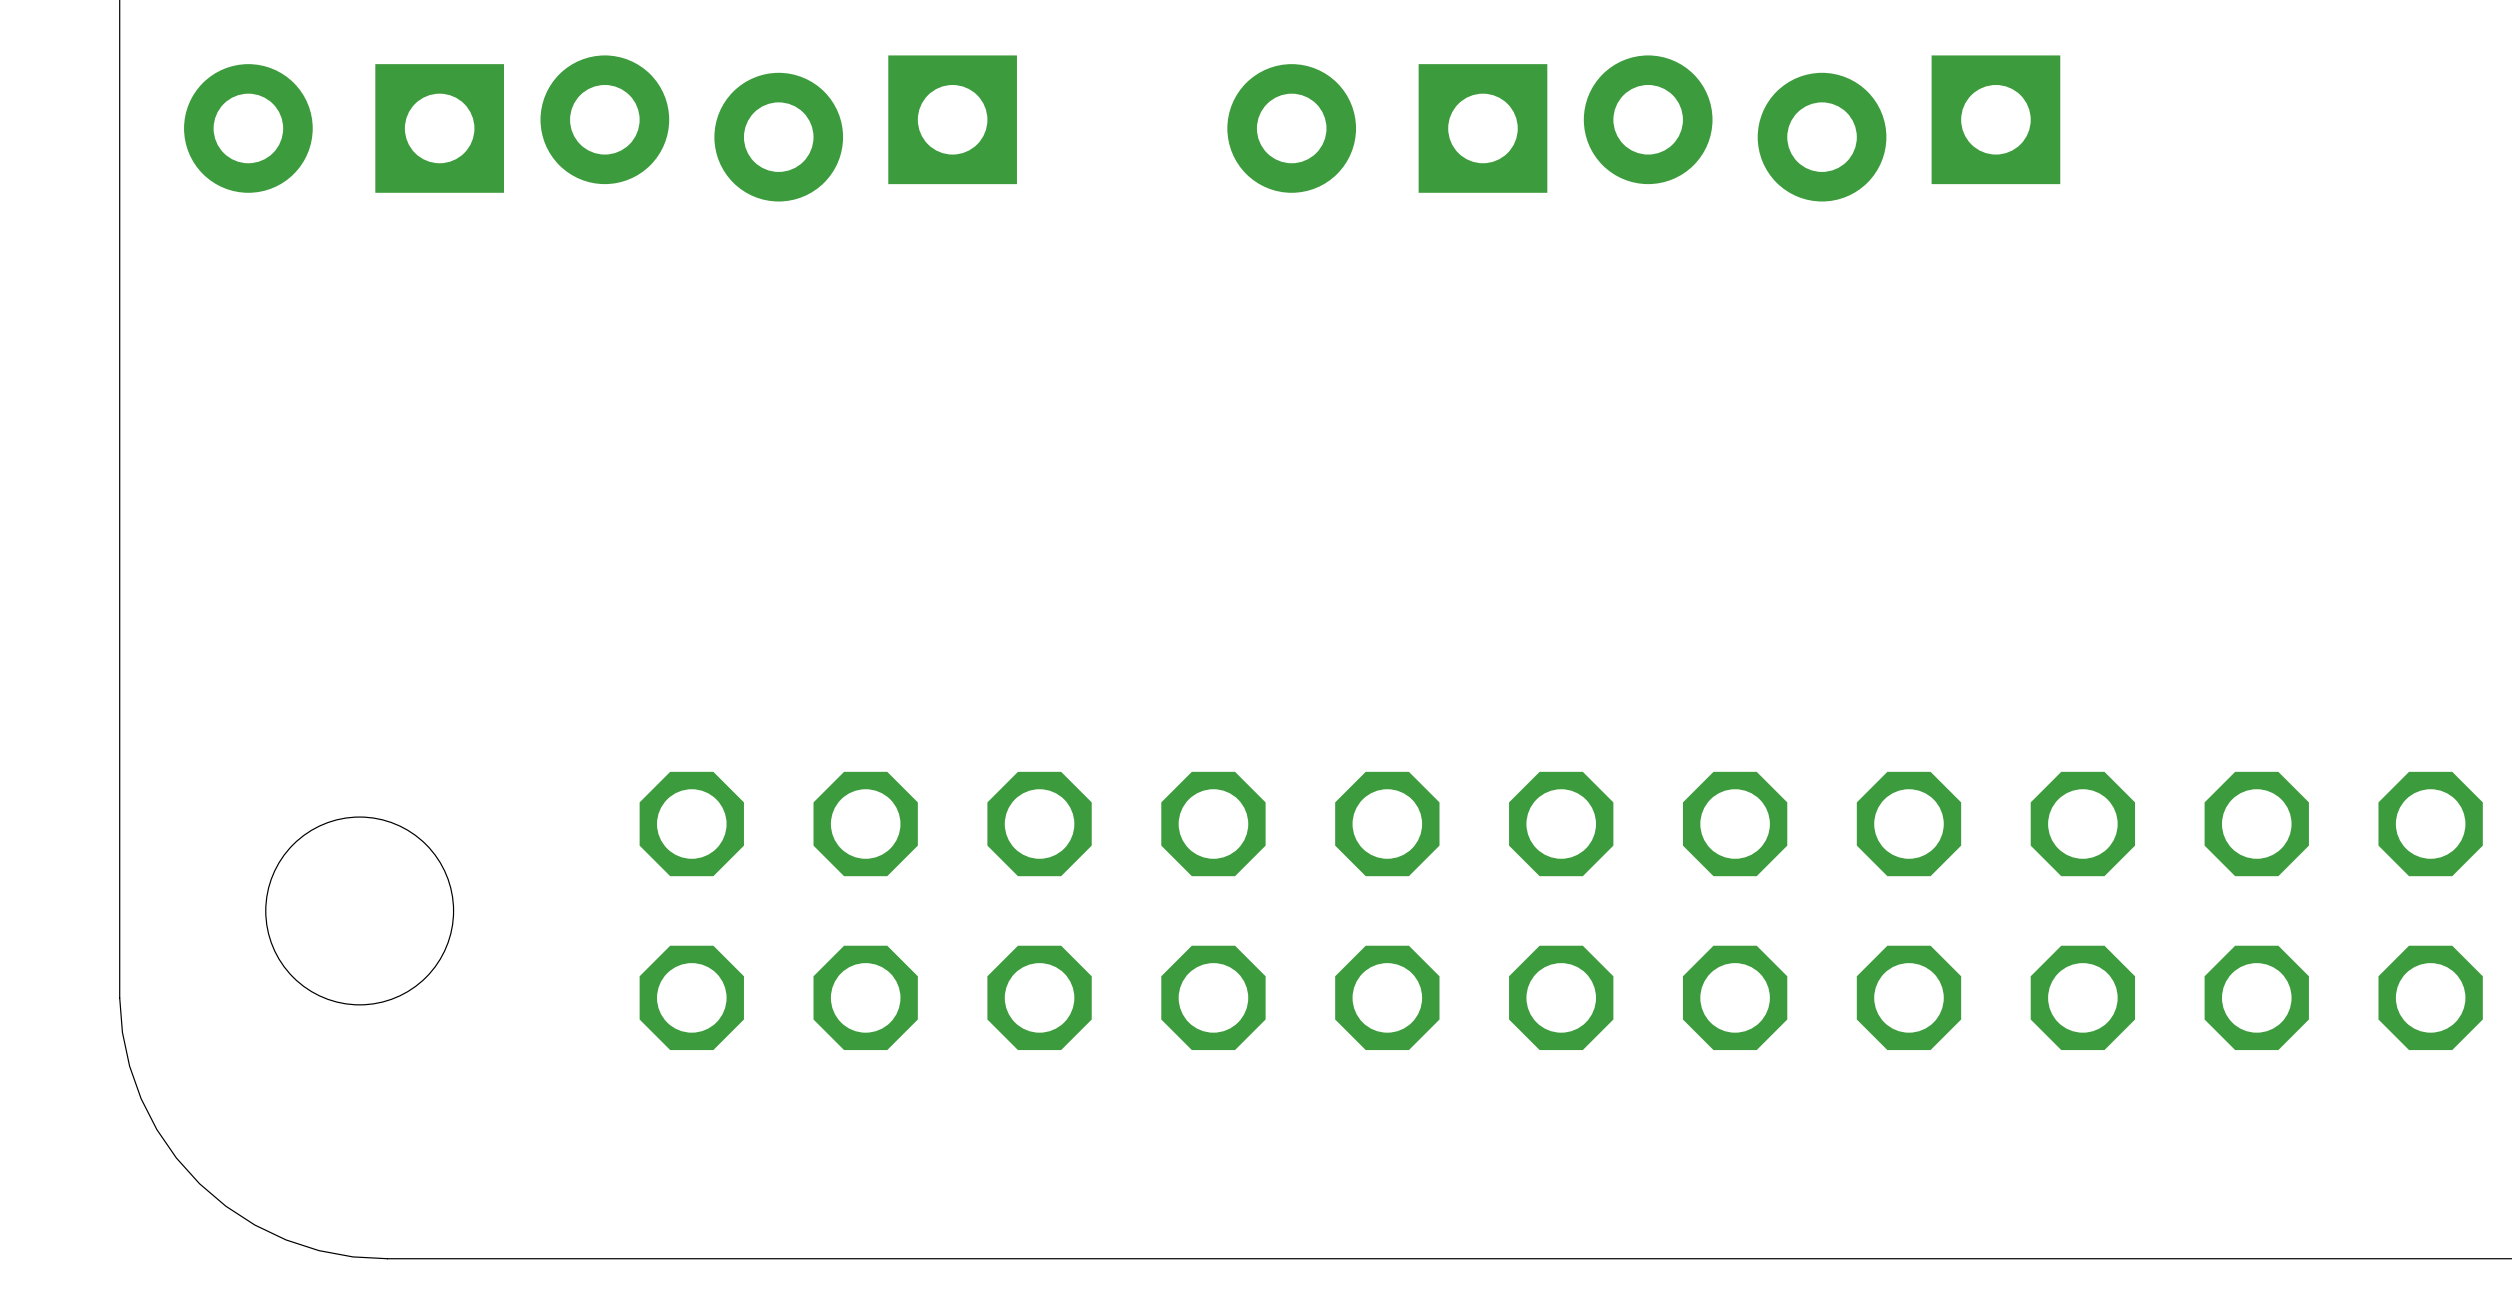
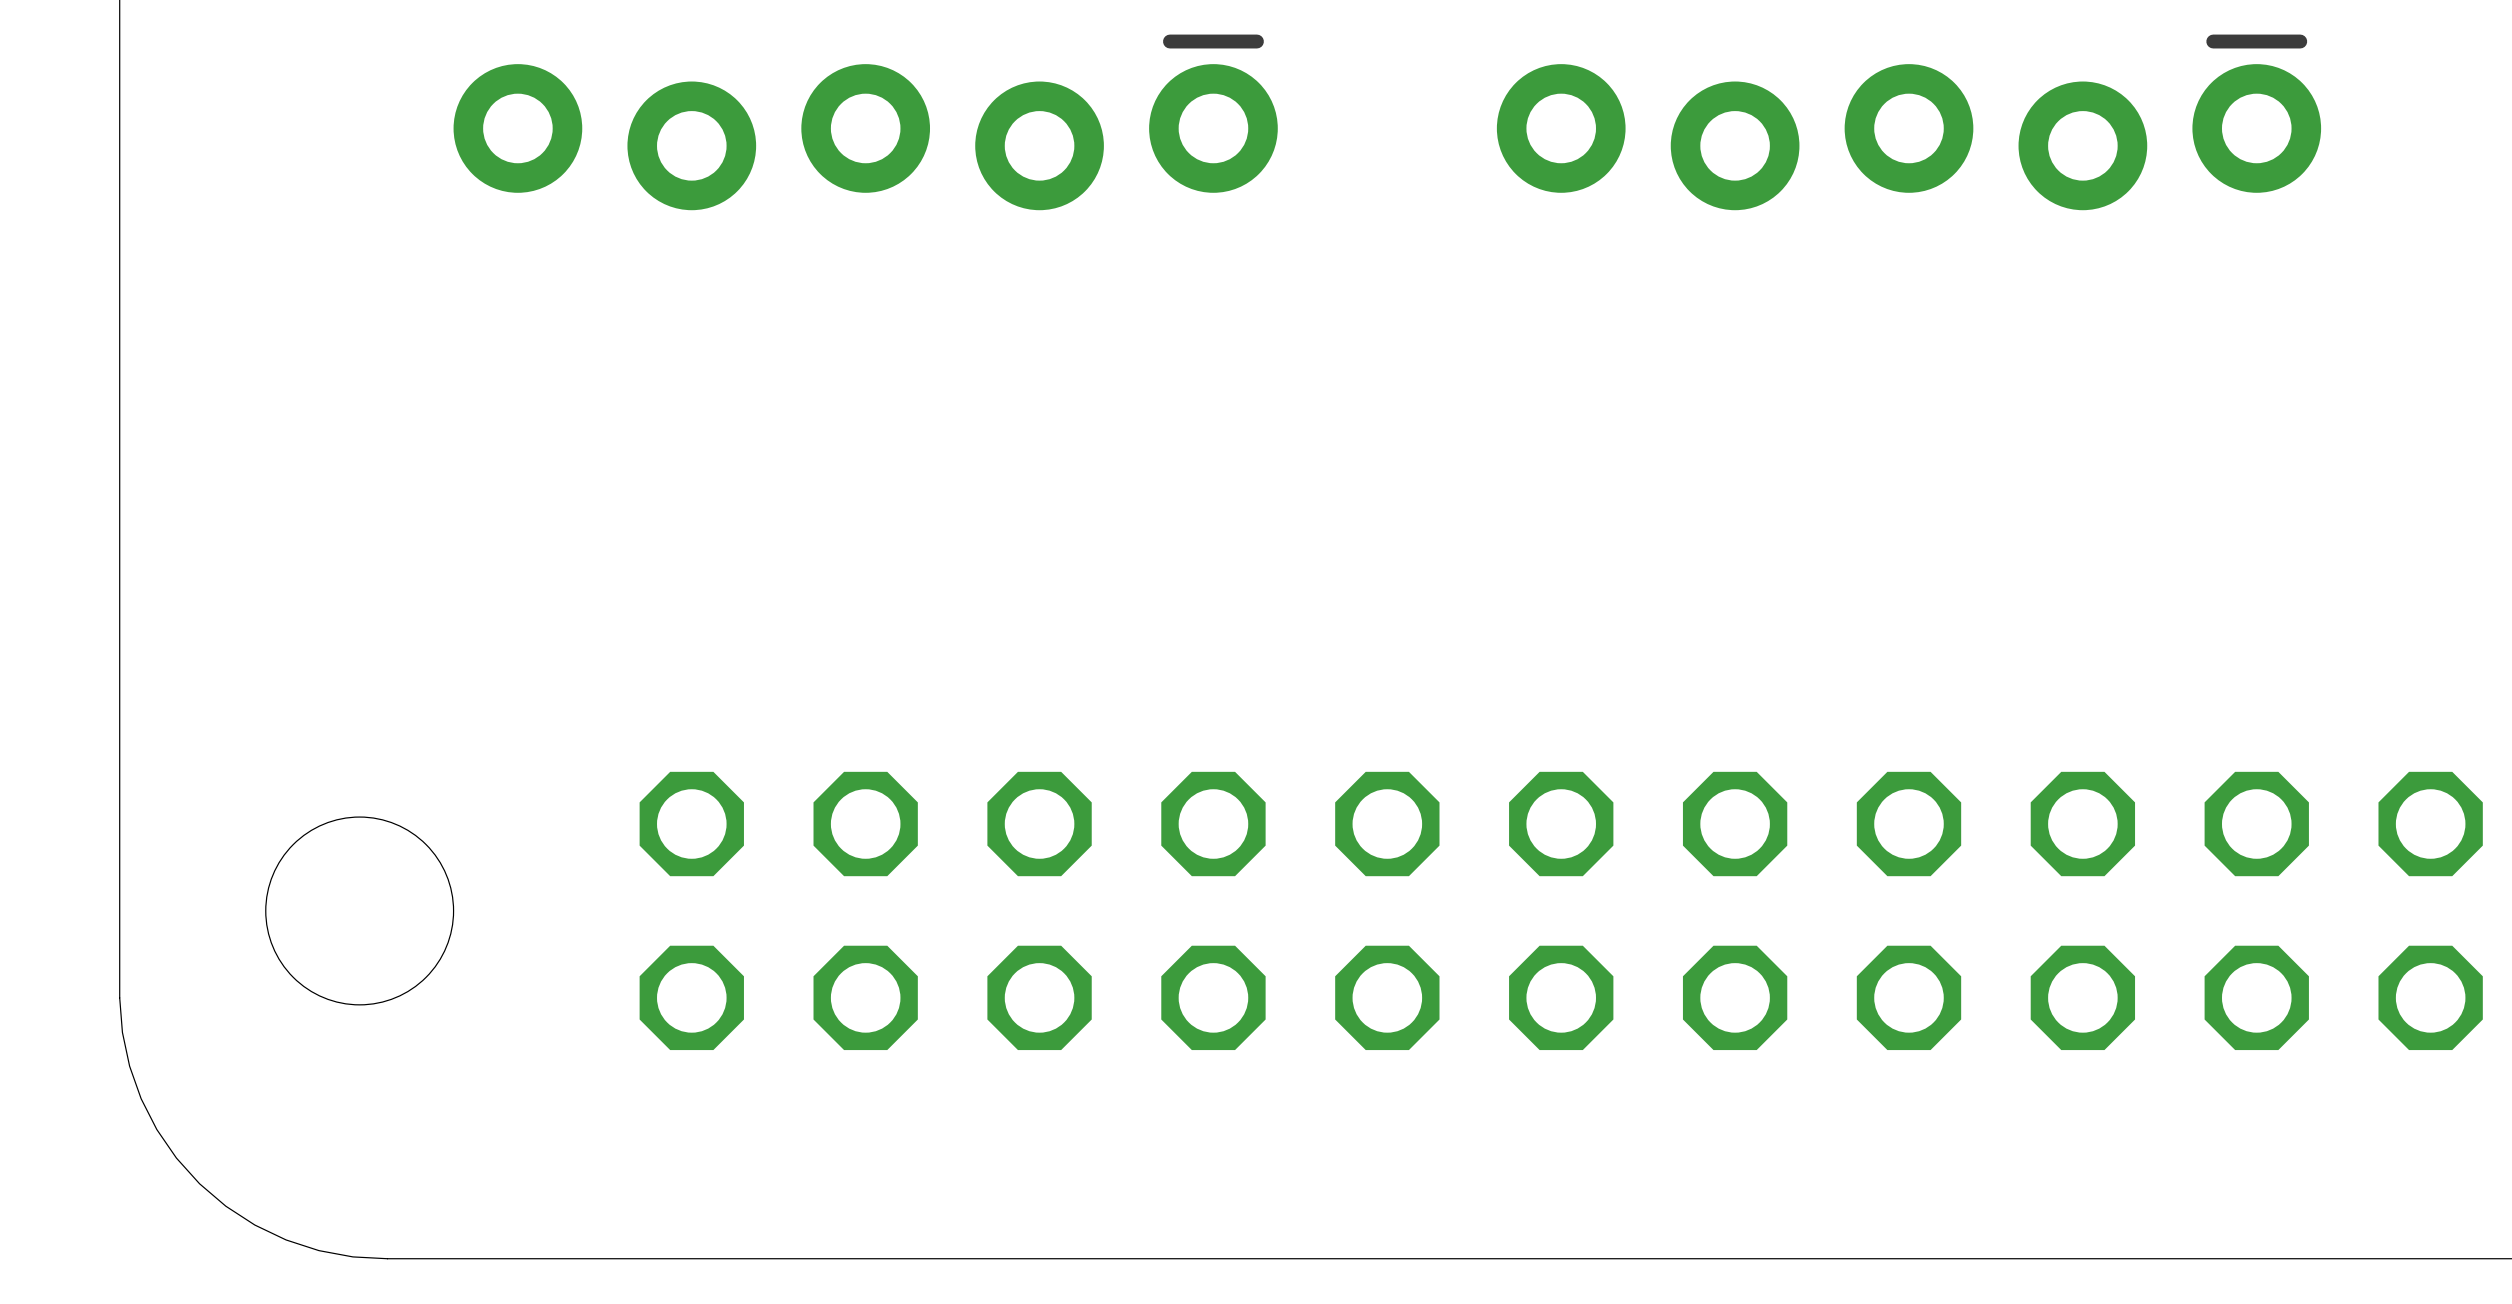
part: none -> (865, 122)
part: none -> (1908, 122)
part: (344, 128) -> none
part: (778, 128) -> none
part: (1387, 128) -> none
part: (1822, 128) -> none

